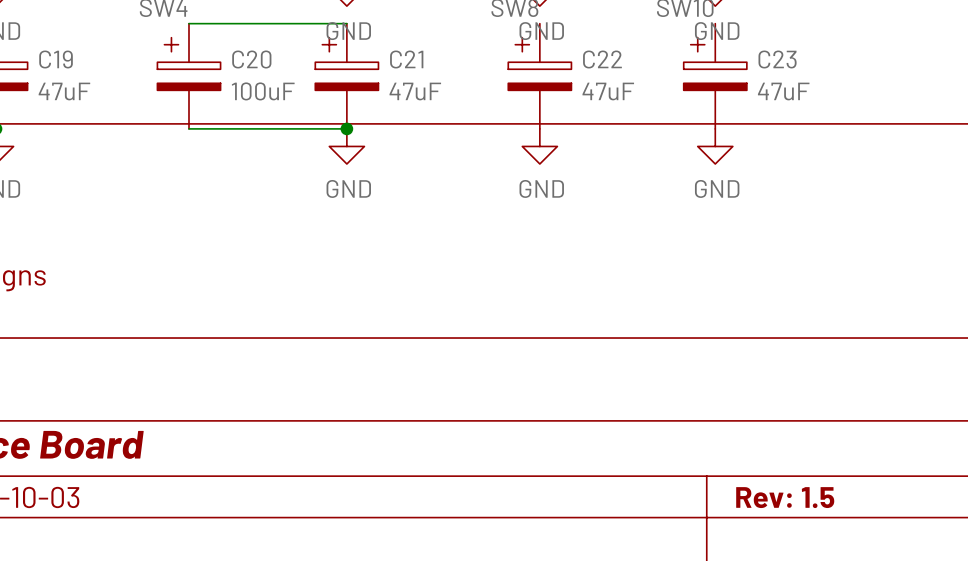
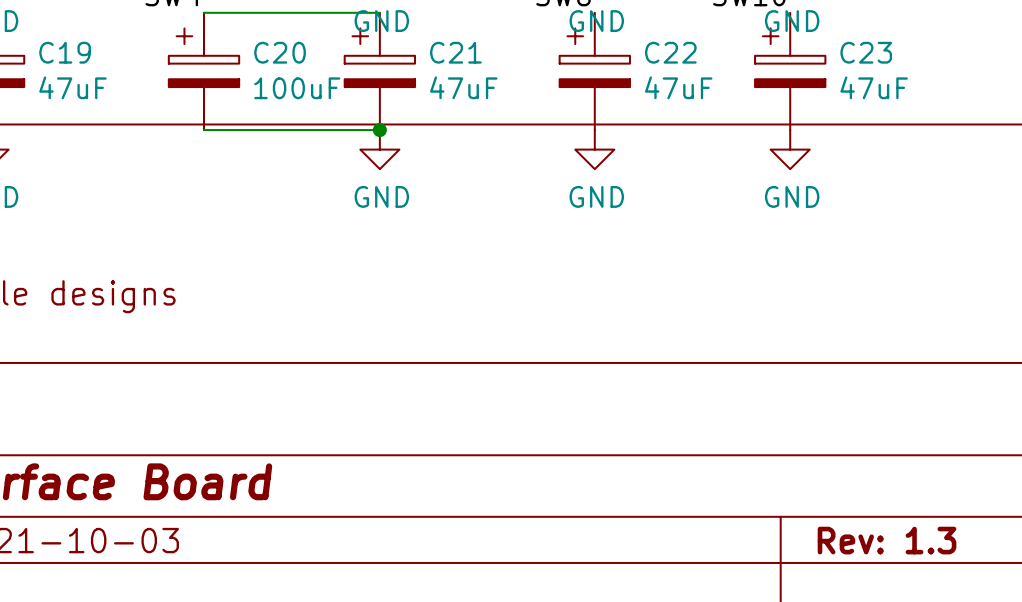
title block: Rev: 1.5 (785, 497) -> Rev: 1.3 (887, 540)

